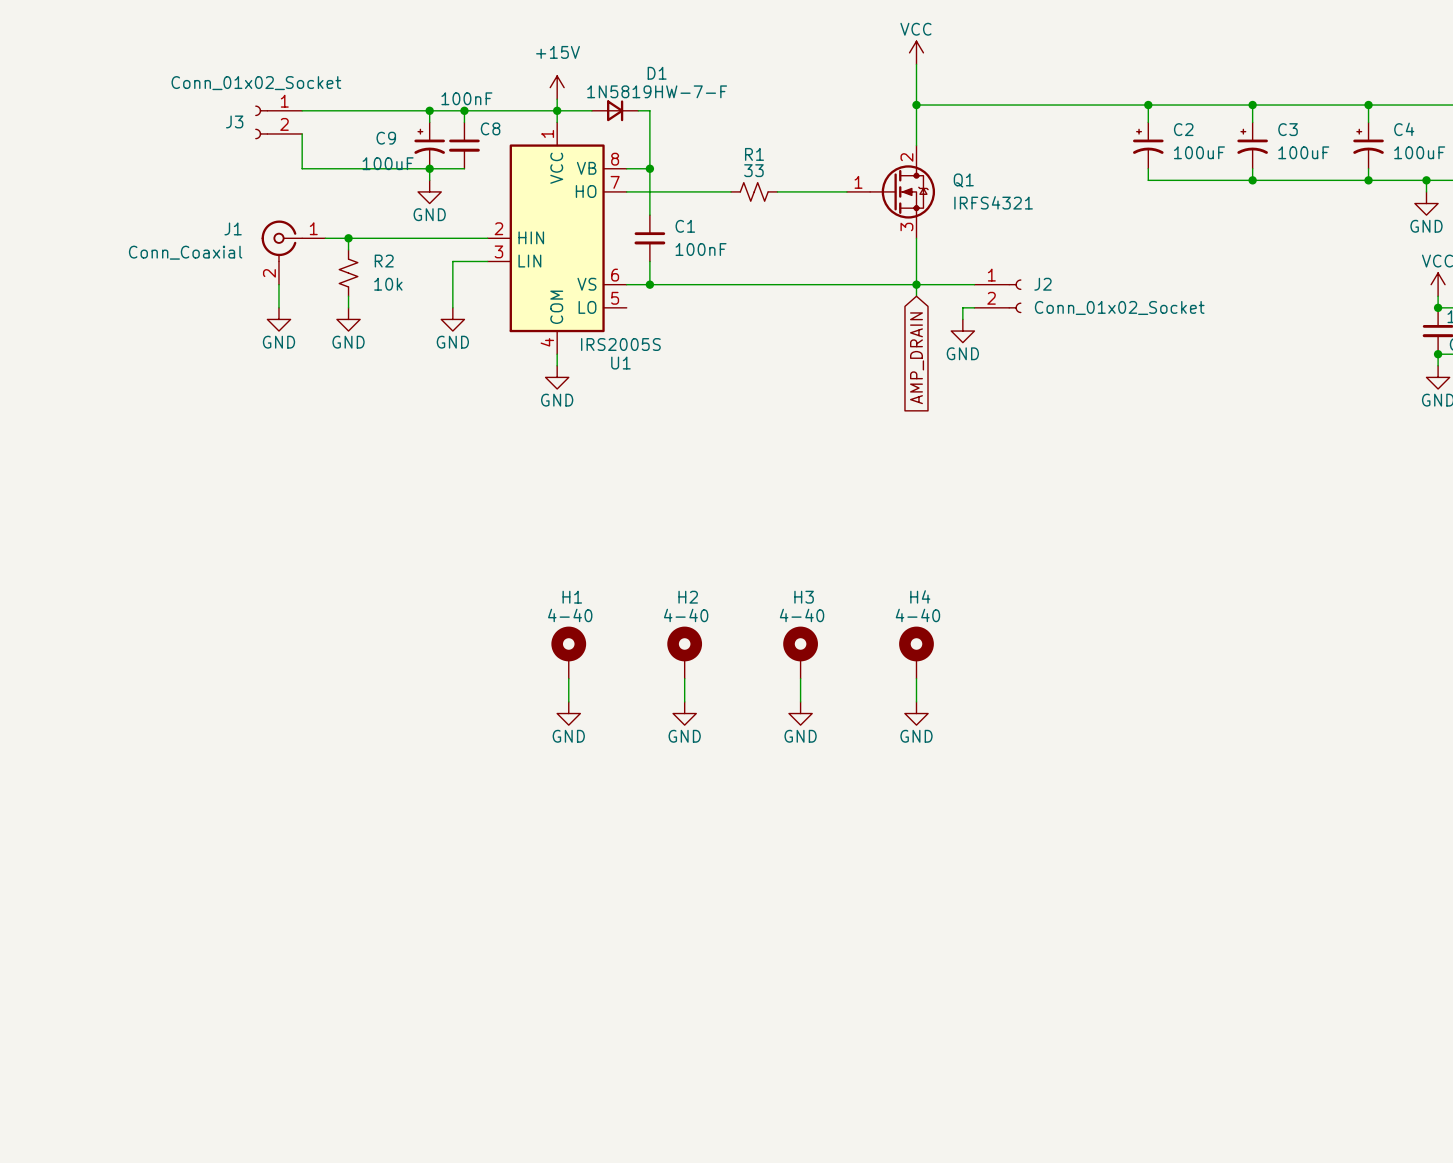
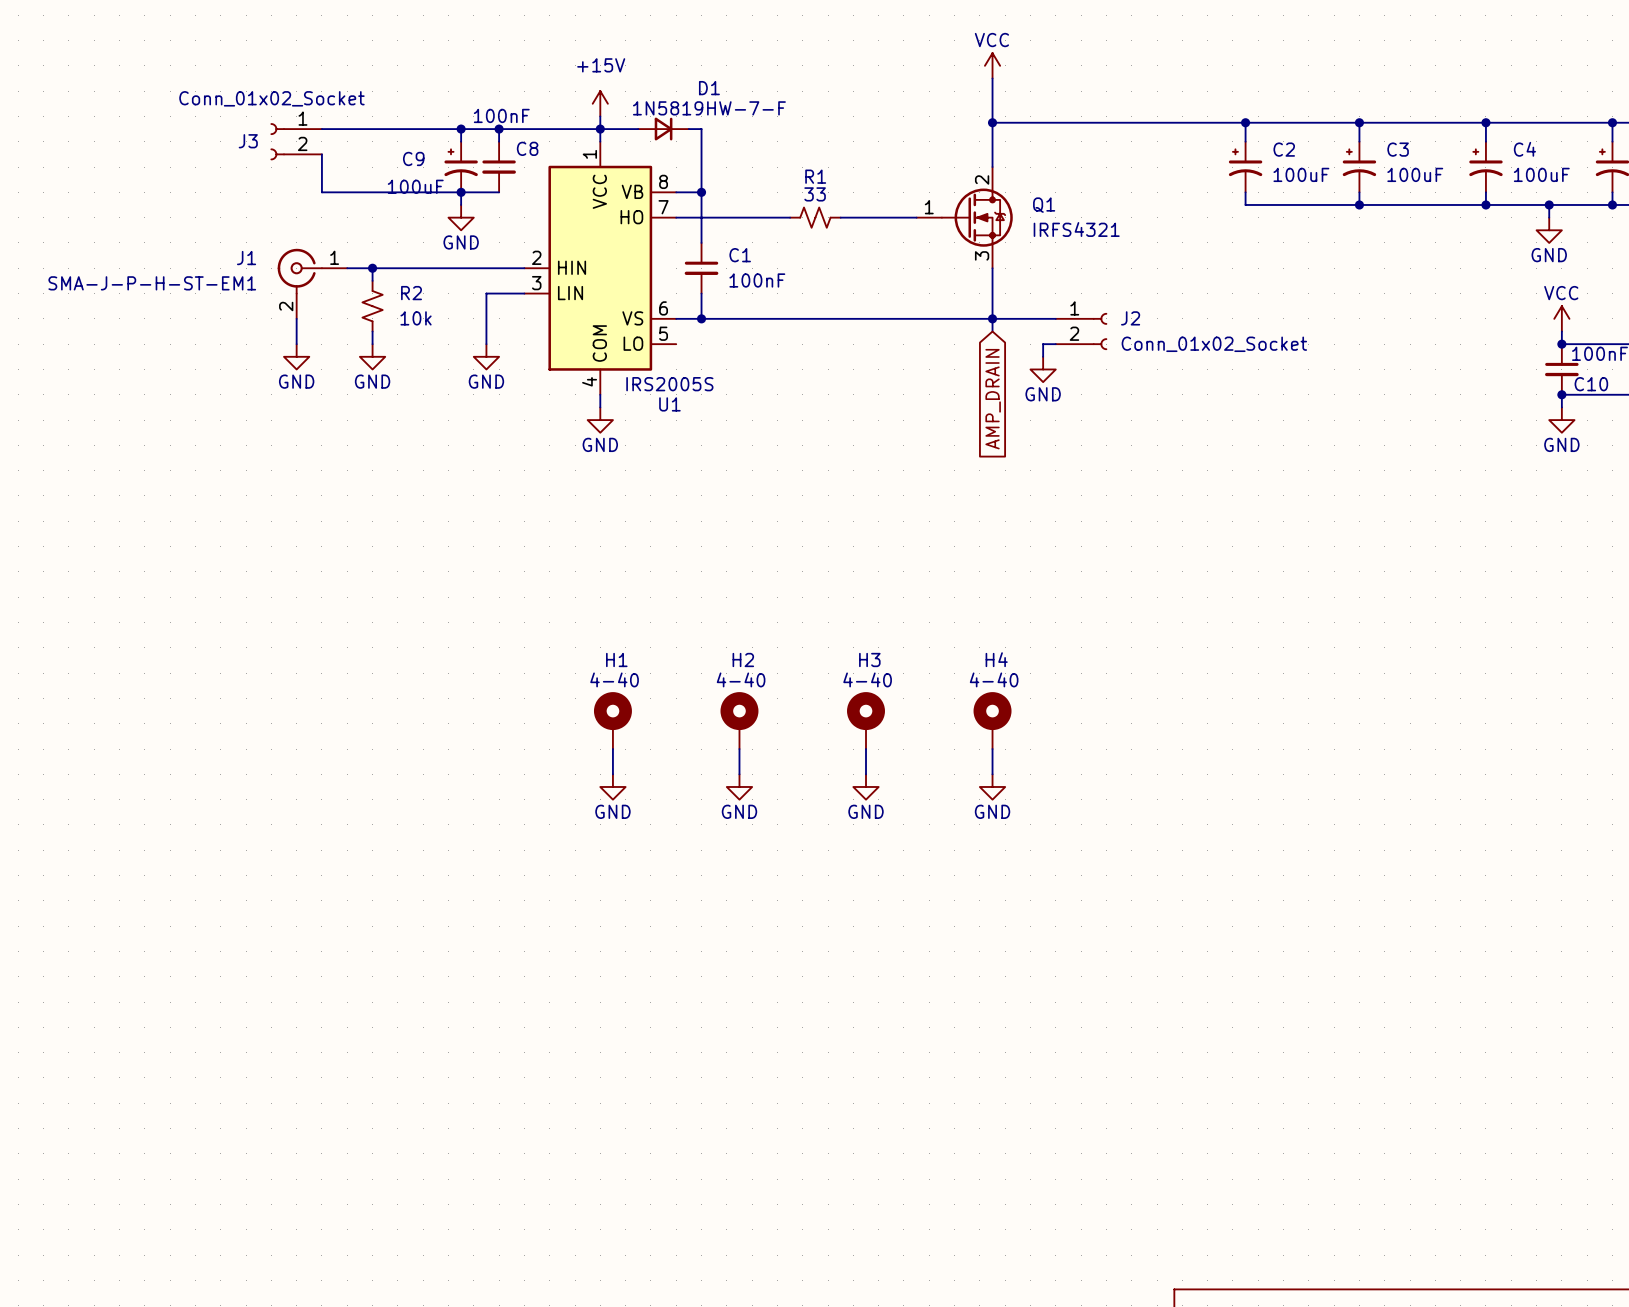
J1 value: Conn_Coaxial (185, 252) -> SMA-J-P-H-ST-EM1 (152, 283)

